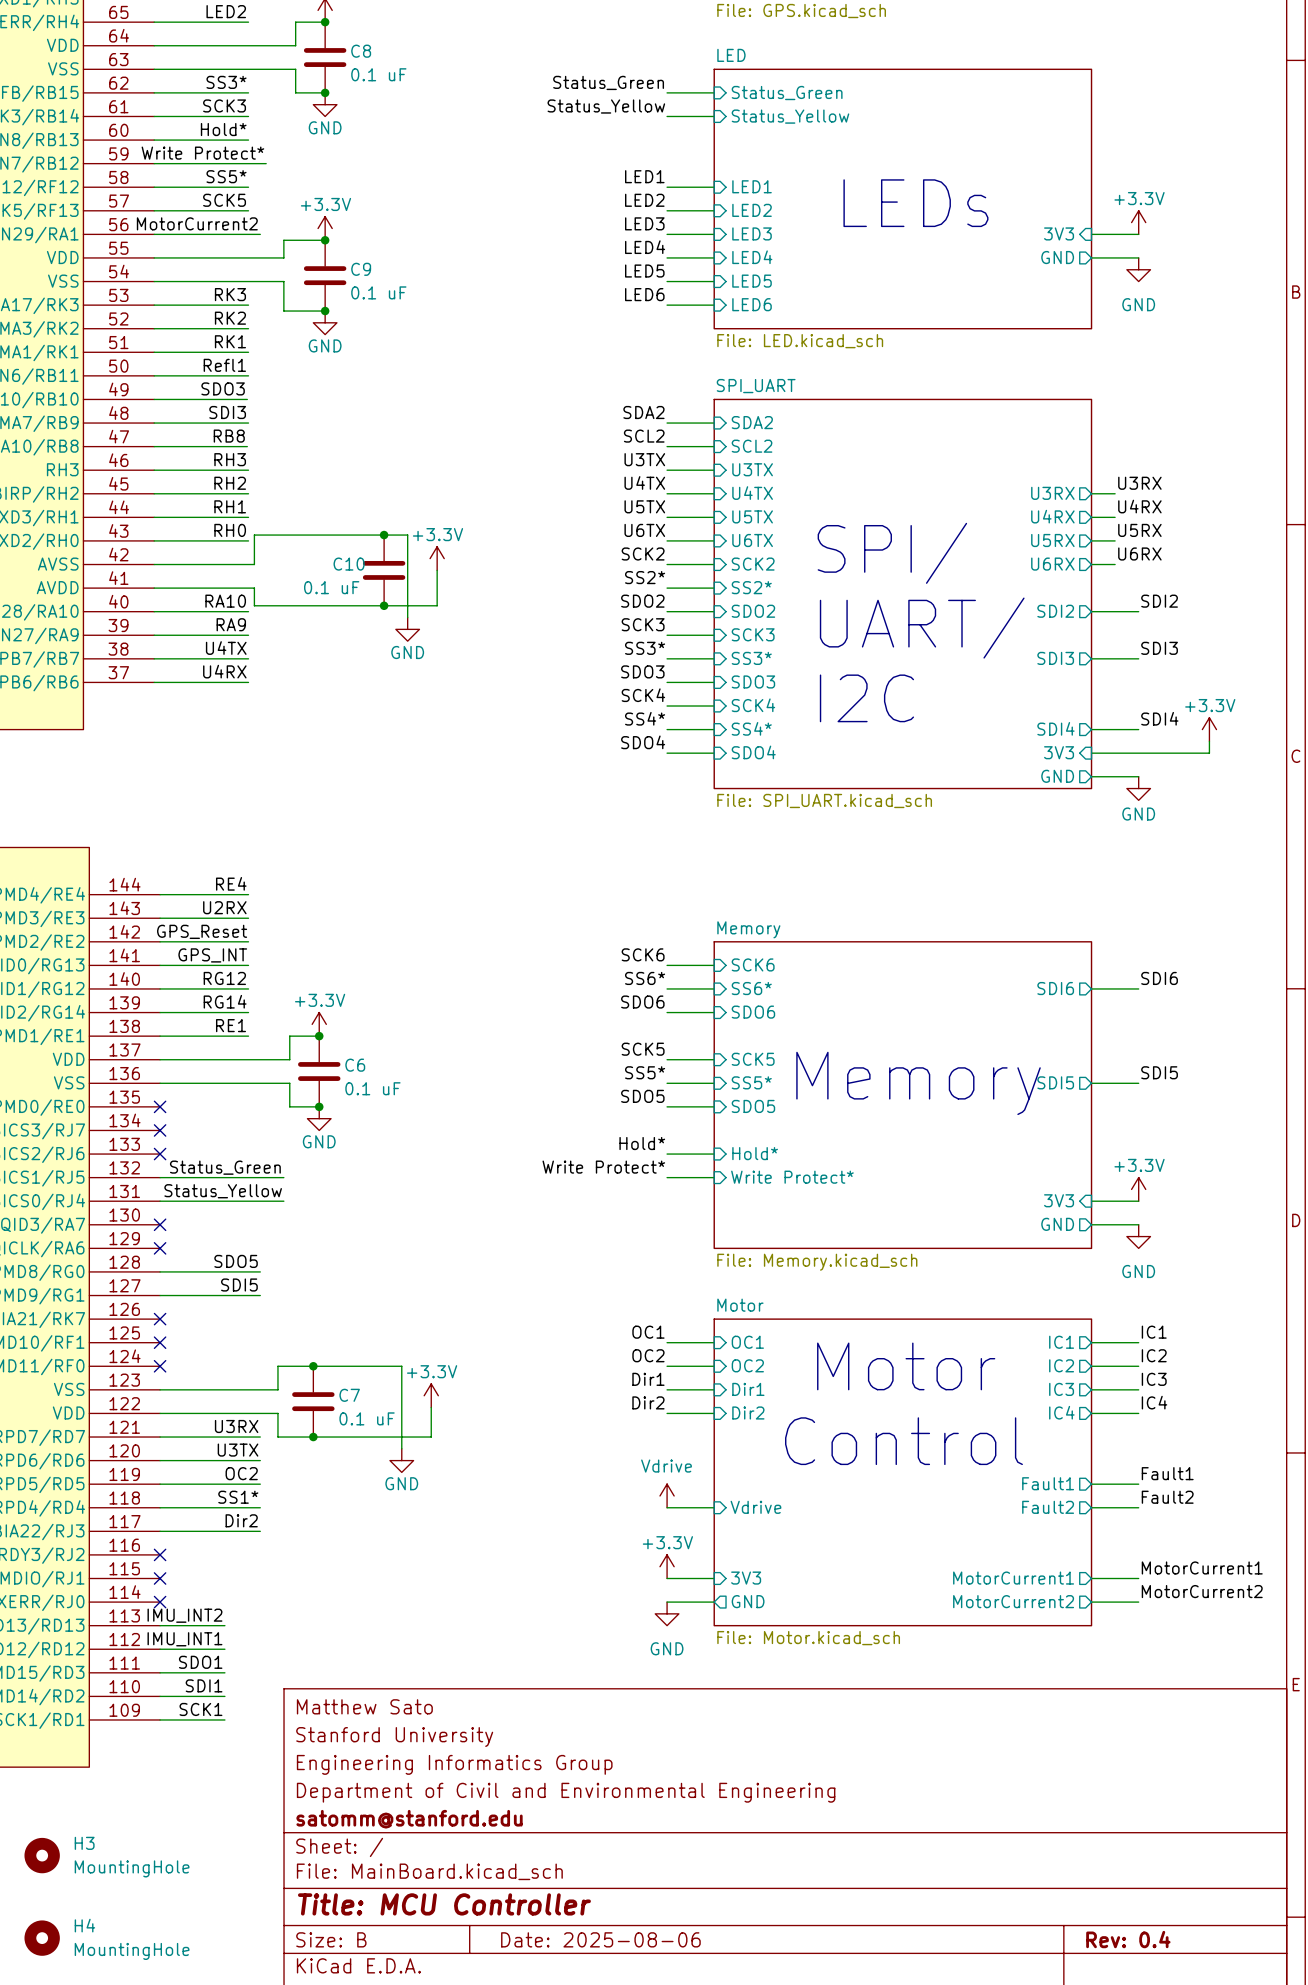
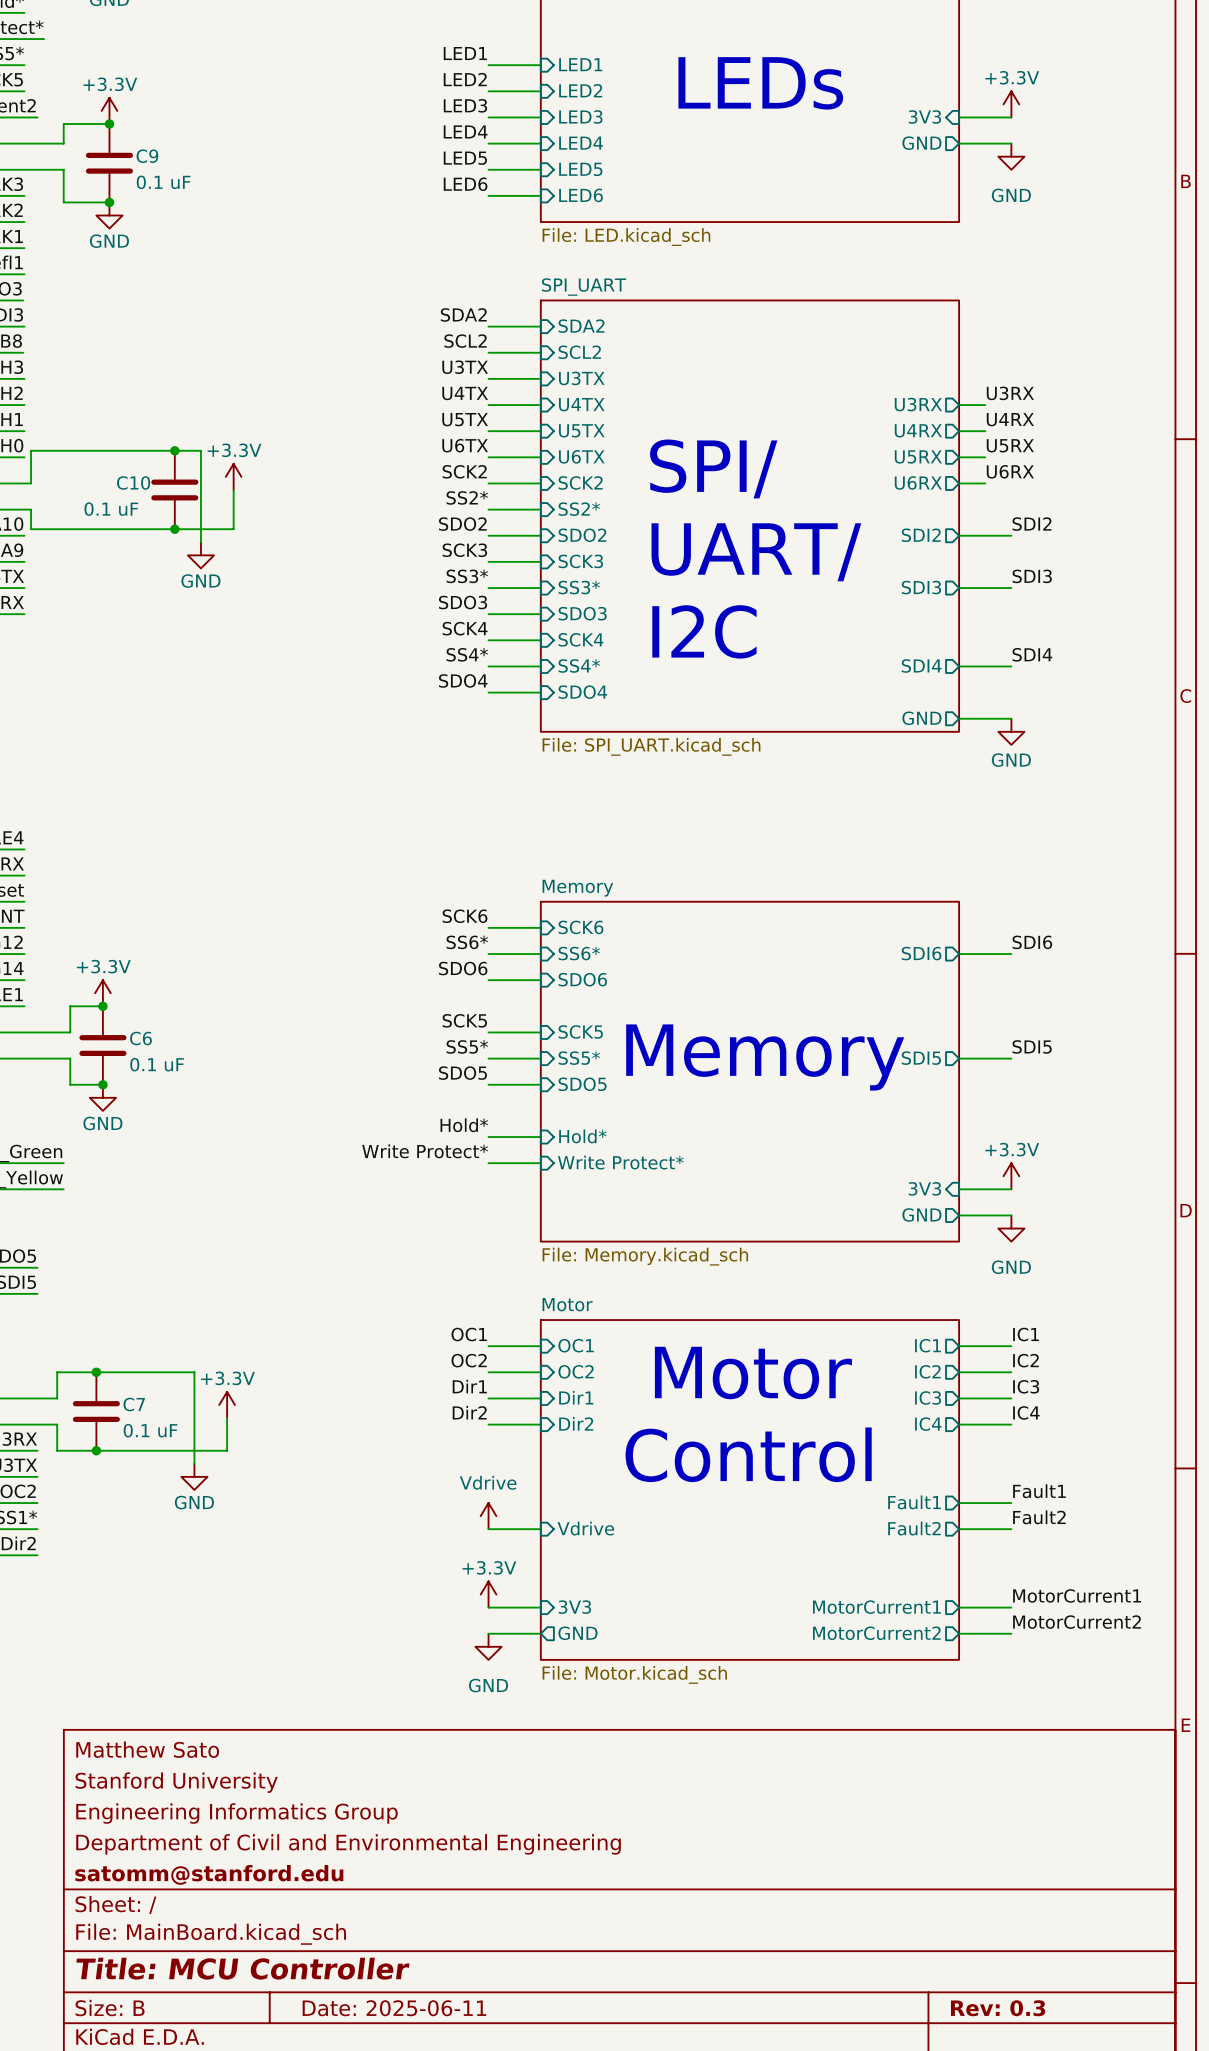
power symbol: +3.3V (1209, 729) -> none
wire: (1209, 741) (1209, 753) (1091, 753) -> none
sheet pin: 3V3 (1059, 752) -> none
title block: Date: 2025-08-06 (600, 1939) -> Date: 2025-06-11 (394, 2008)
title block: Rev: 0.4 (1128, 1939) -> Rev: 0.3 (998, 2008)

